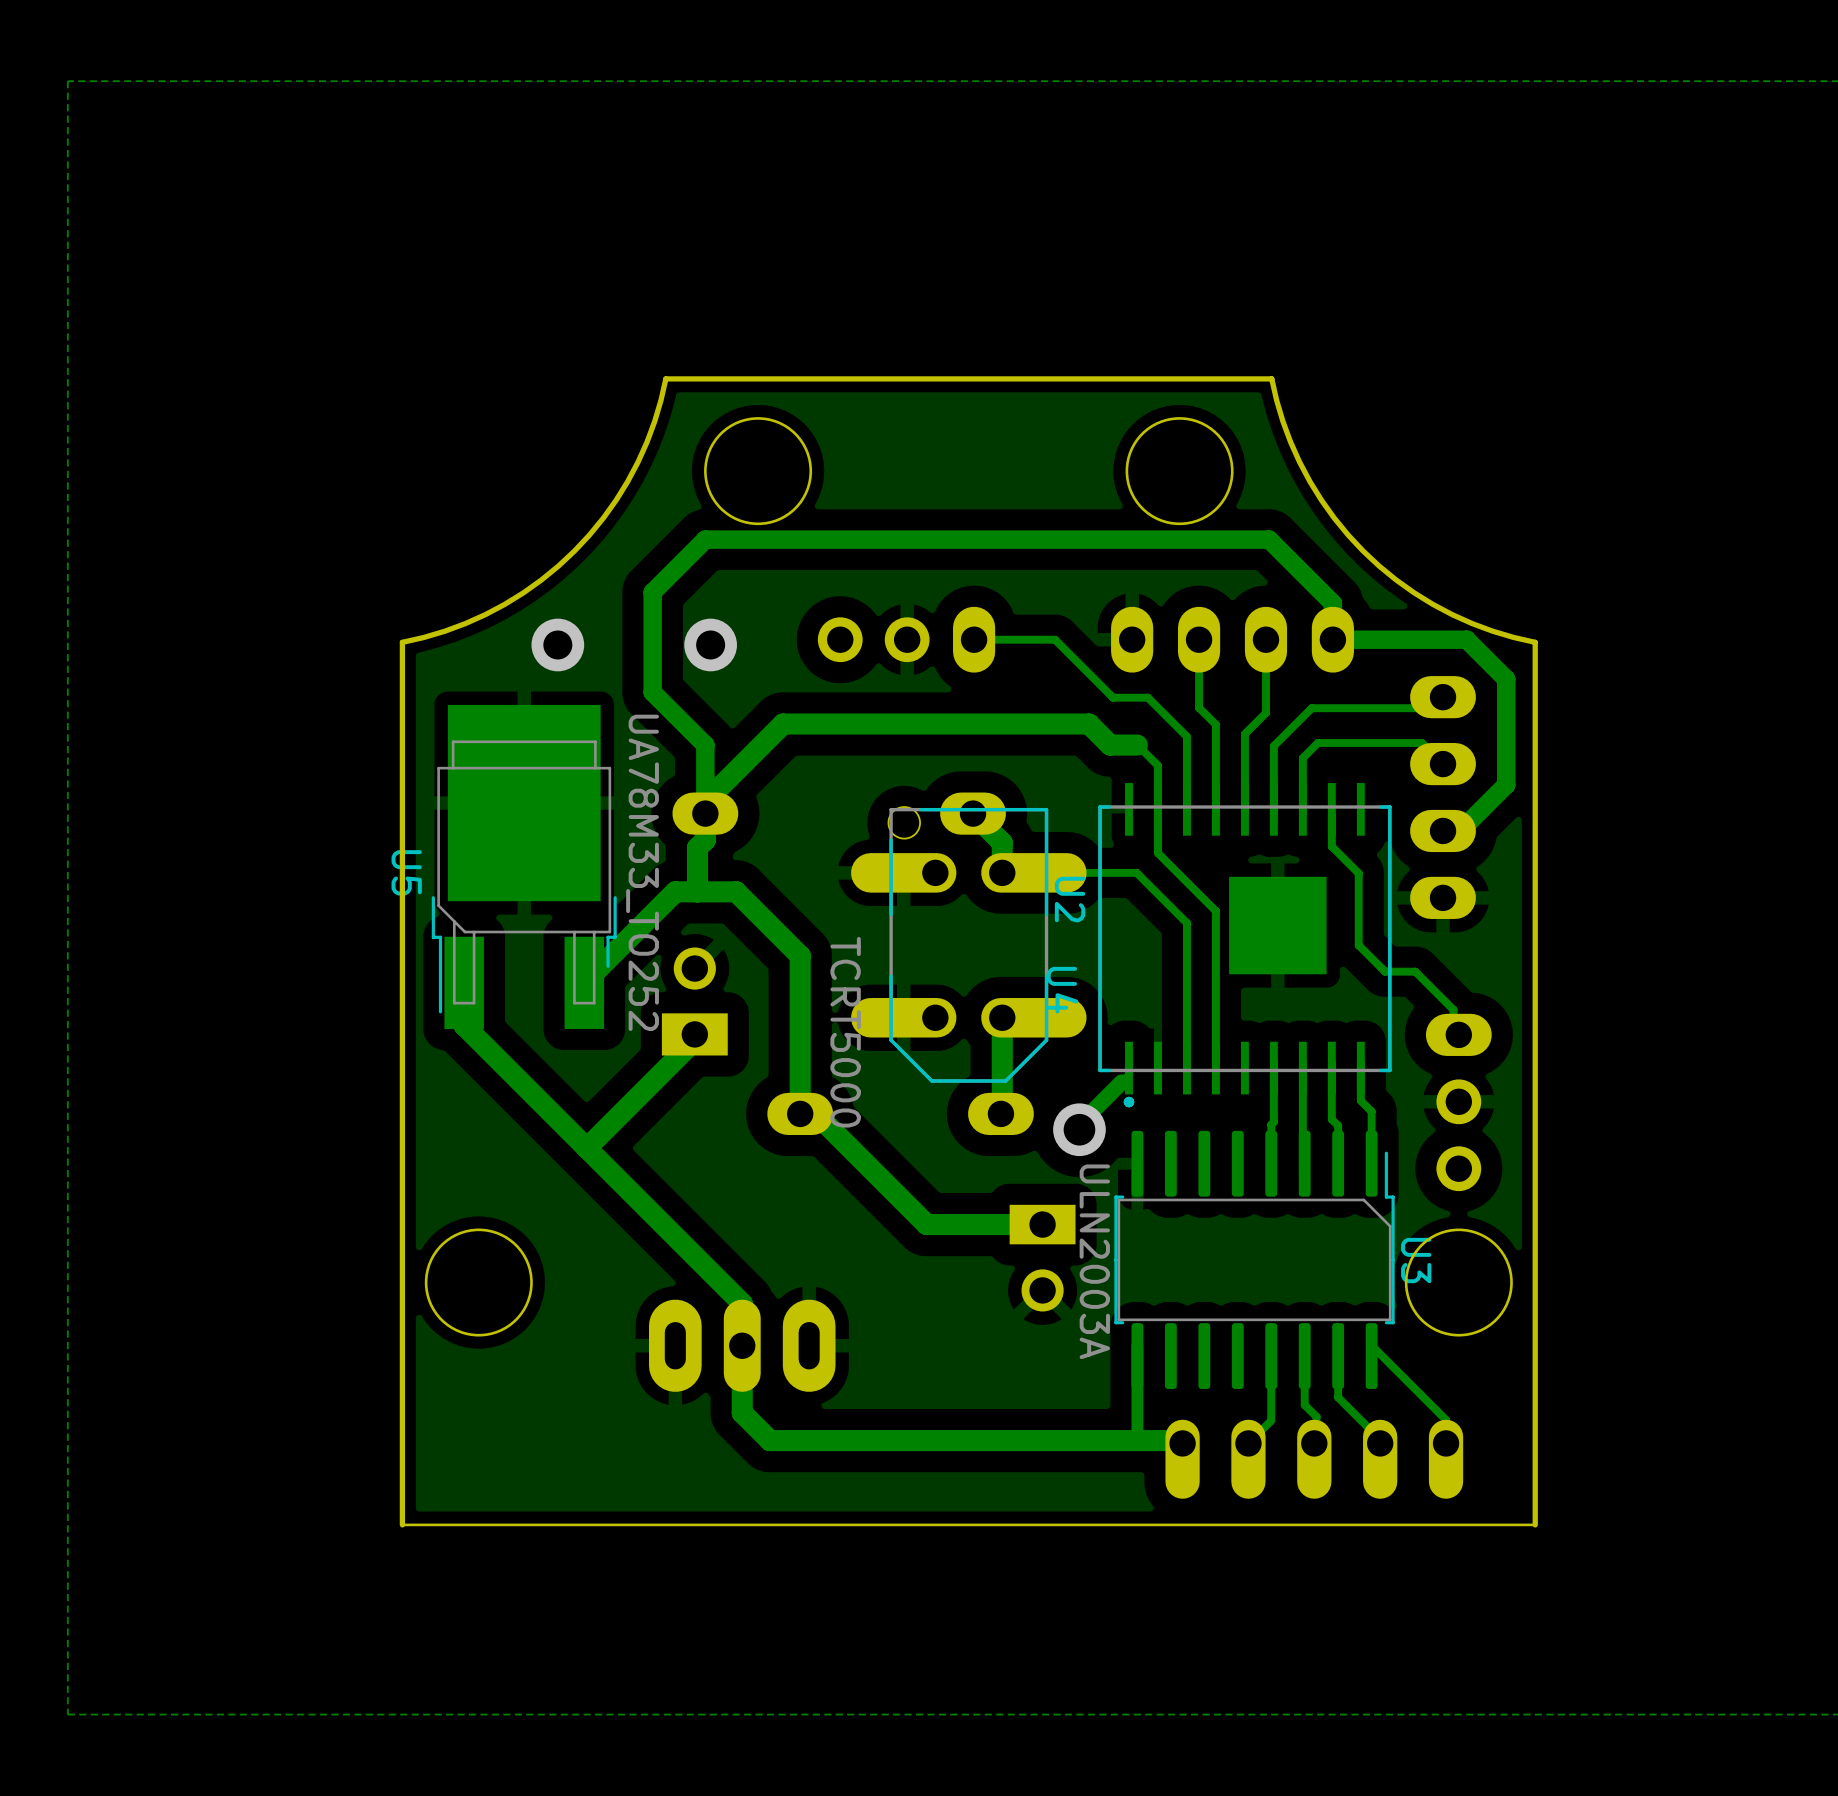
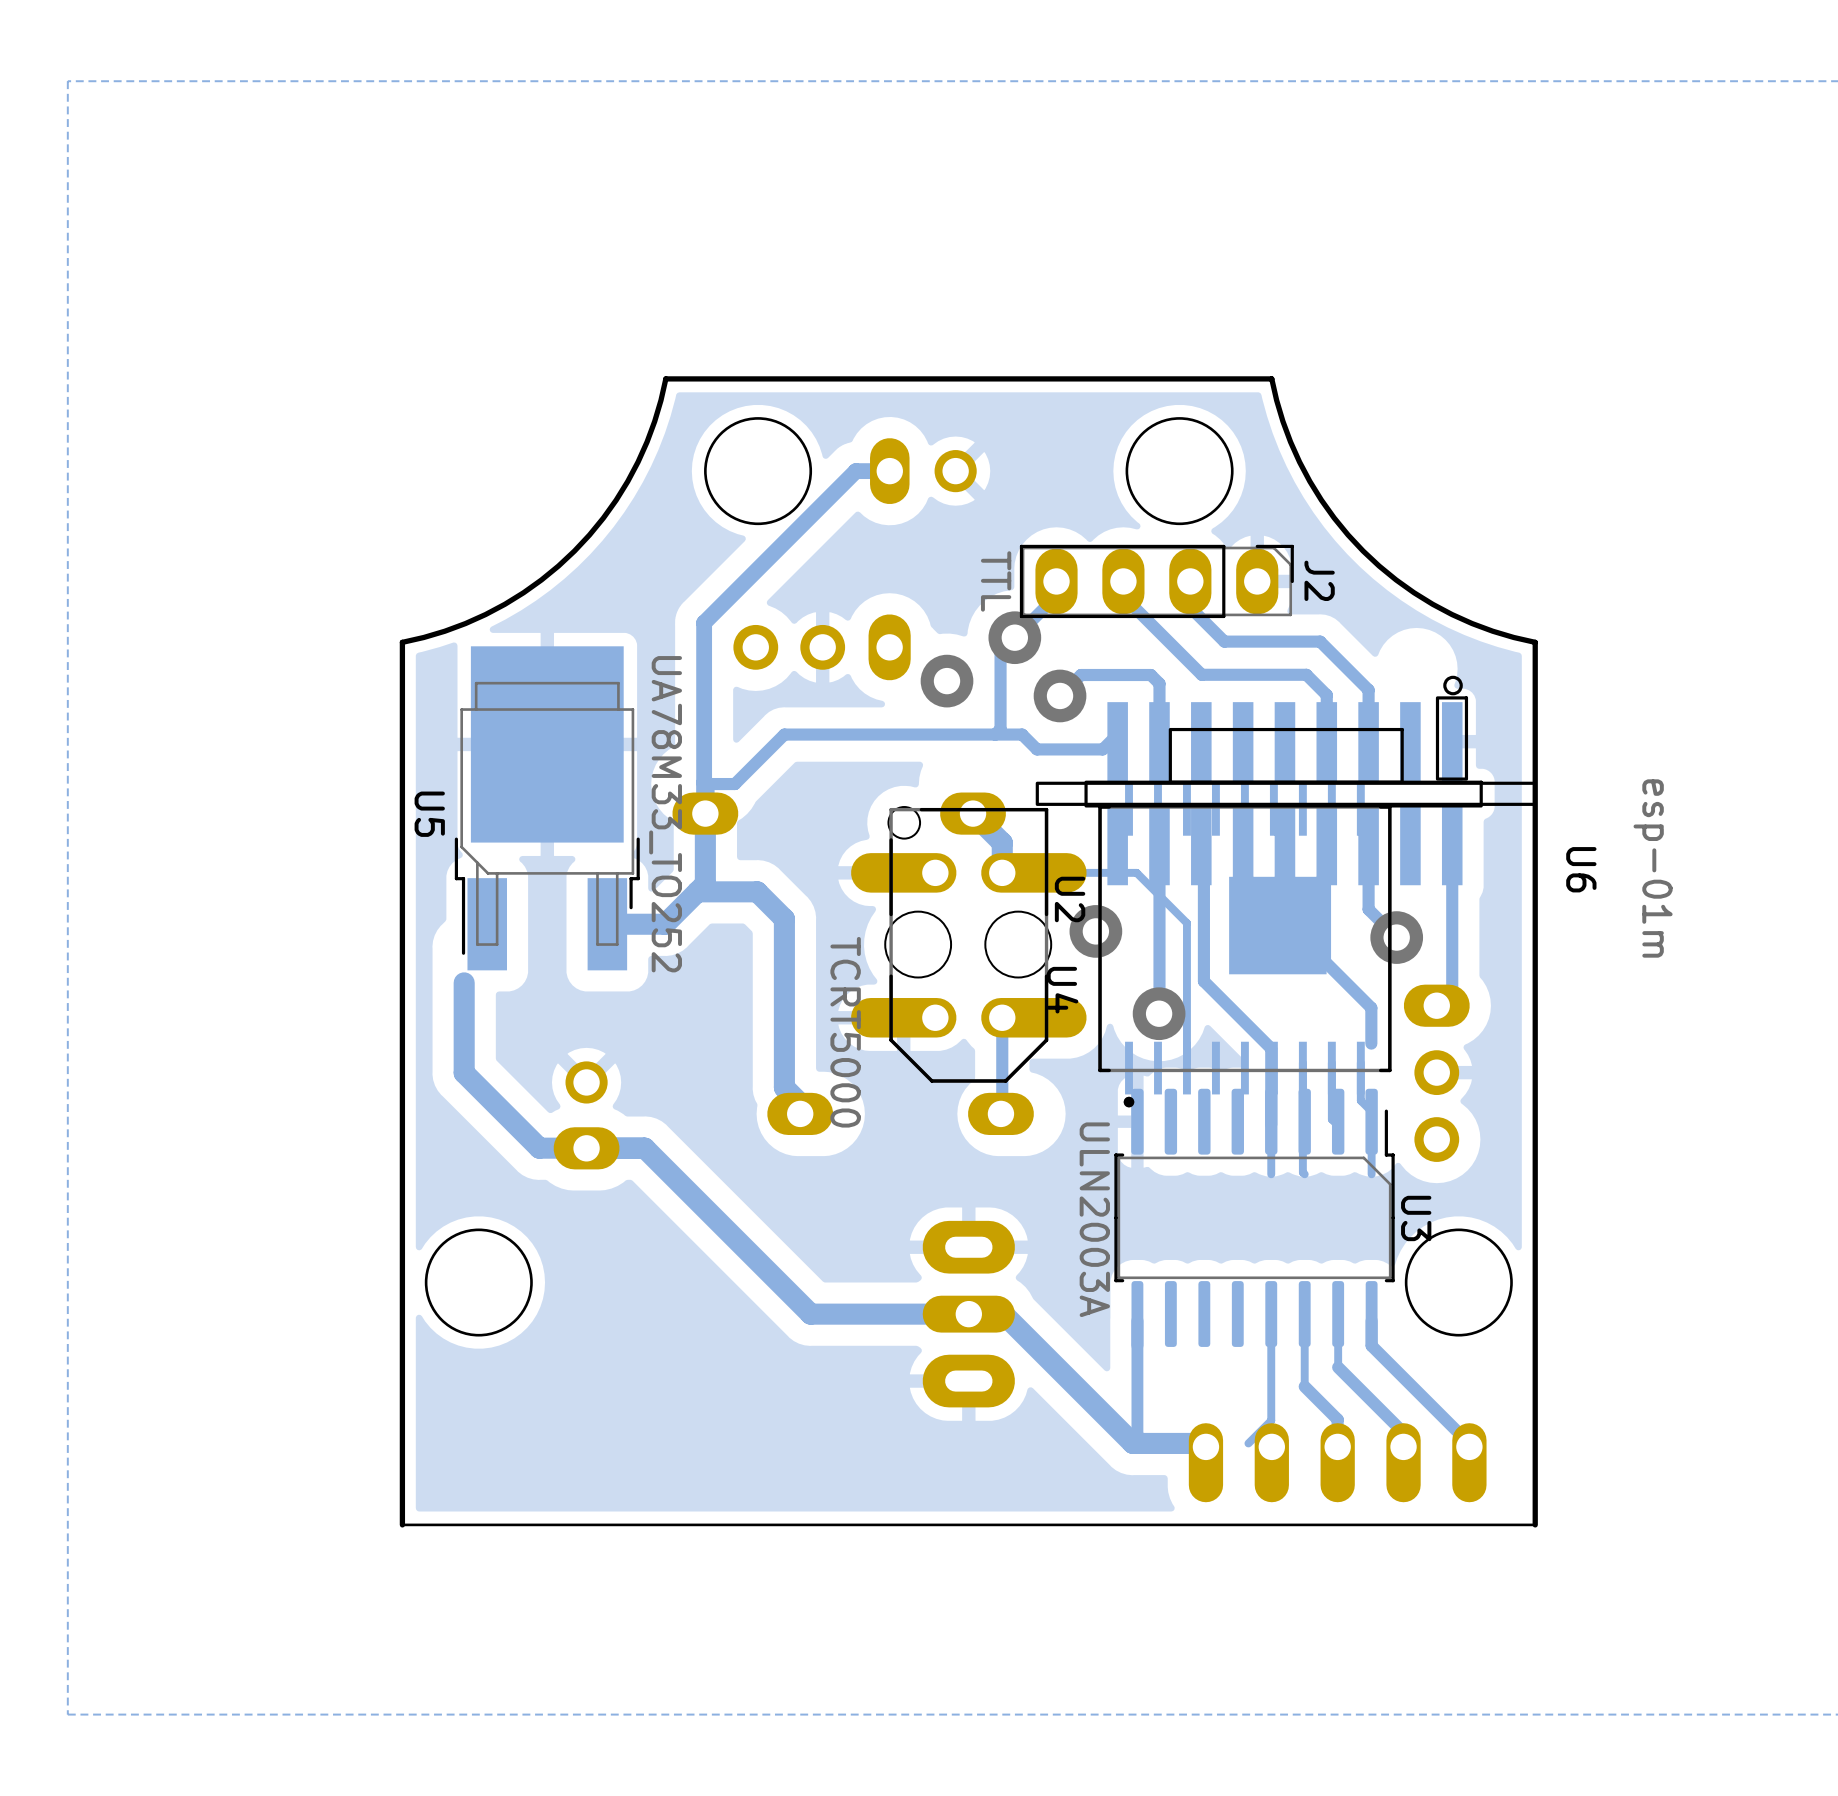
track: none -> (889, 471) (855, 471) (704, 622) (704, 782) (734, 784) (784, 734) (1022, 734) (1037, 749) (1102, 749) (1117, 734)
part: none -> (923, 471)
track: none -> (1056, 581) (1056, 596) (1000, 651) (1000, 729) (995, 734)
track: none -> (1123, 581) (1123, 596) (1201, 674) (1306, 674) (1326, 695) (1326, 734)
track: none -> (1190, 581) (1190, 607) (1224, 641) (1320, 641) (1368, 690) (1368, 741)
via: none -> (1014, 637)
part position: (906, 639) -> (822, 647)
track: (974, 639) (1055, 639) (1113, 697) (1147, 697) (1186, 736) (1186, 814) -> none
track: (1199, 639) (1199, 707) (1215, 724) (1215, 814) -> none
J2 side: top (1232, 639) -> bottom (1156, 581)
track: (1265, 639) (1265, 712) (1244, 734) (1244, 814) -> none
via: (557, 644) -> none
via: (710, 644) -> none
via: none -> (947, 681)
track: none -> (1060, 695) (1081, 675) (1150, 675) (1159, 683) (1159, 734)
via: none -> (1060, 695)
track: (1443, 697) (1431, 708) (1311, 708) (1273, 746) (1273, 814) -> none
track: (1443, 764) (1421, 742) (1317, 742) (1302, 758) (1302, 814) -> none
U6: none -> esp-01m (1286, 780)
track: (705, 784) (705, 745) (652, 692) (652, 592) (705, 539) (1269, 539) (1332, 603) (1332, 639) (1466, 639) (1506, 679) (1506, 784) (1460, 830) (1443, 830) -> none
part: (1443, 797) -> none
U2 footprint: [851, 807, 1087, 1083] -> [851, 807, 1087, 1083]
track: (705, 813) (705, 801) (783, 724) (1089, 724) (1110, 745) (1137, 745) (1157, 765) (1157, 853) (1215, 911) (1215, 1062) -> none
track: (1331, 814) (1331, 846) (1358, 873) (1358, 945) (1385, 971) (1415, 971) (1453, 1009) (1453, 1013) -> none
track: (705, 839) (697, 847) (697, 891) (675, 891) (584, 982) -> (705, 839) (705, 883) (665, 924) (607, 924)
track: none -> (1159, 845) (1159, 1013)
track: none -> (1452, 845) (1452, 990) (1436, 1005)
U5 position: (524, 866) -> (547, 808)
track: none -> (1326, 866) (1324, 868) (1324, 961) (1371, 1007) (1371, 1043)
track: none -> (1368, 866) (1368, 909) (1396, 937)
track: (736, 891) (800, 955) (800, 1113) (816, 1113) (926, 1224) (1042, 1224) -> (736, 891) (757, 891) (784, 918) (784, 1087) (810, 1113)
via: none -> (1095, 931)
via: none -> (1396, 937)
part: (694, 1001) -> none
via: none -> (1159, 1013)
track width: thick (1002, 1017) (1002, 1104) -> thin (1002, 1017) (1002, 1104)
track: (464, 1025) (742, 1303) (742, 1412) (769, 1440) (1179, 1440) (1182, 1443) -> (464, 1025) (464, 1072) (539, 1148) (644, 1148) (810, 1314) (1003, 1314) (1132, 1443) (1202, 1443) (1205, 1446)
track: (694, 1034) (694, 1040) (586, 1148) -> none
track: (1129, 1062) (1129, 1074) (1079, 1124) (1079, 1129) -> none
track: (1273, 1062) (1273, 1122) (1271, 1124) -> (1201, 866) (1203, 868) (1203, 981) (1271, 1048) (1271, 1124)
part position: (1458, 1102) -> (1436, 1073)
part: none -> (586, 1115)
via: (1079, 1129) -> none
part: (1042, 1258) -> none
U3 position: (1254, 1259) -> (1254, 1217)
track: none -> (1371, 1320) (1371, 1345) (1469, 1443) (1469, 1446)
part rotation: 0° (742, 1345) -> 90° clockwise (968, 1314)
part position: (742, 1345) -> (968, 1314)
track: (1371, 1345) (1446, 1419) (1446, 1443) -> none
track: (1338, 1367) (1338, 1397) (1380, 1439) (1380, 1443) -> (1338, 1367) (1403, 1432) (1403, 1446)
track: (1304, 1386) (1304, 1405) (1316, 1416) (1316, 1441) (1314, 1443) -> (1304, 1386) (1337, 1419) (1337, 1446)
part position: (1314, 1459) -> (1337, 1462)

